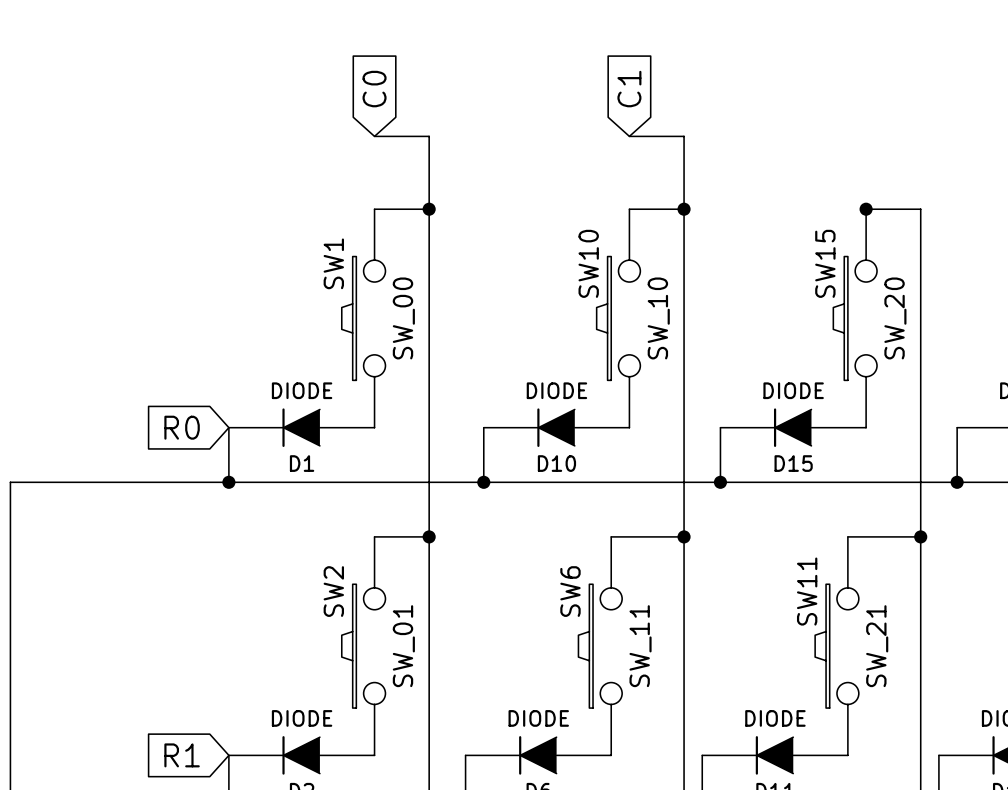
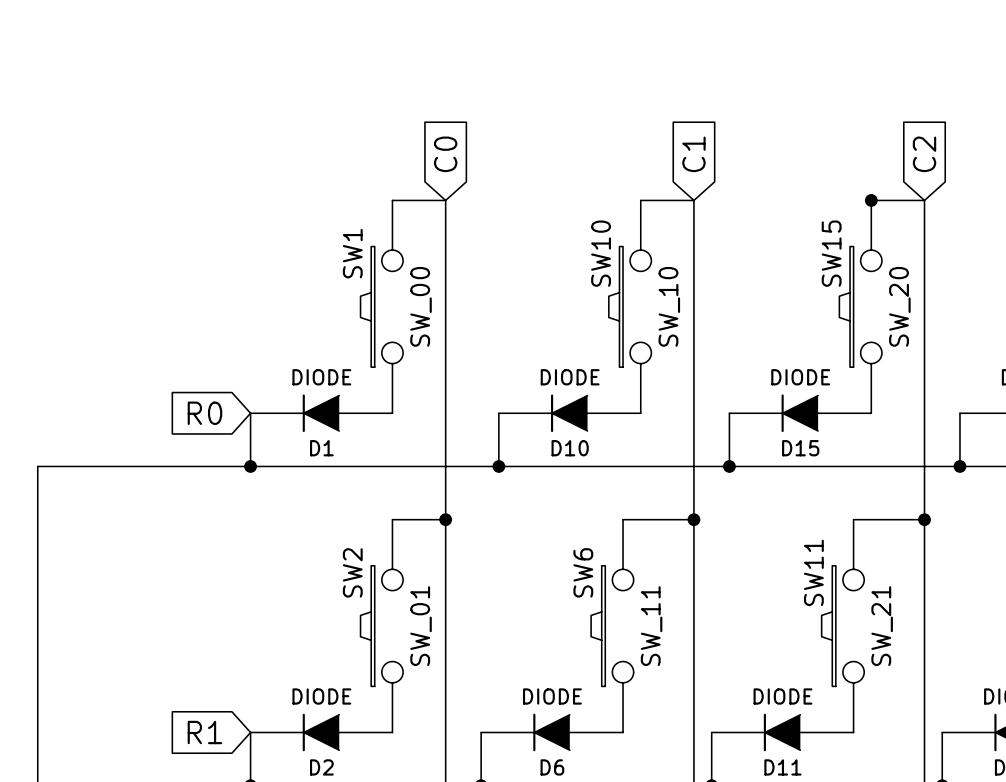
global label position: C0 (374, 89) -> C0 (445, 154)
global label position: C1 (629, 89) -> C1 (693, 154)
wire: (374, 136) (429, 136) (429, 209) -> none
wire: (629, 136) (684, 136) (684, 209) -> none
global label: none -> C2 (924, 154)
junction: (429, 209) -> none
junction: (684, 209) -> none

